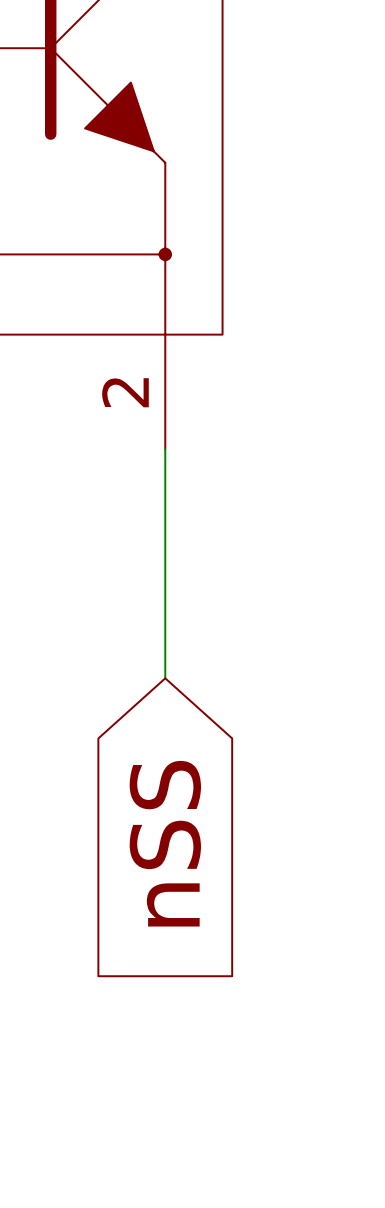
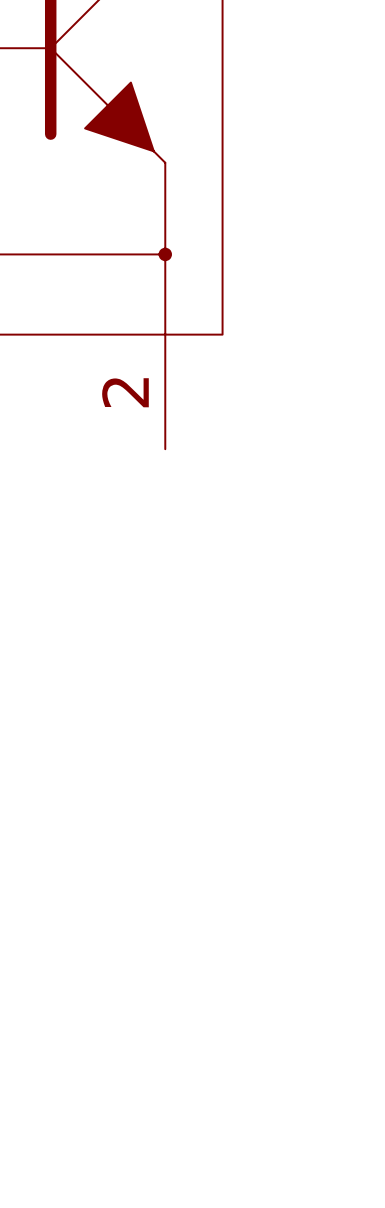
wire: (165, 449) (165, 678) -> none
global label: nSS (165, 843) -> none

